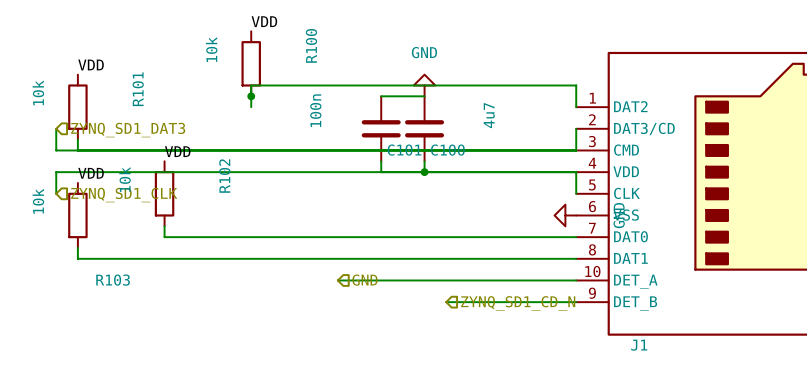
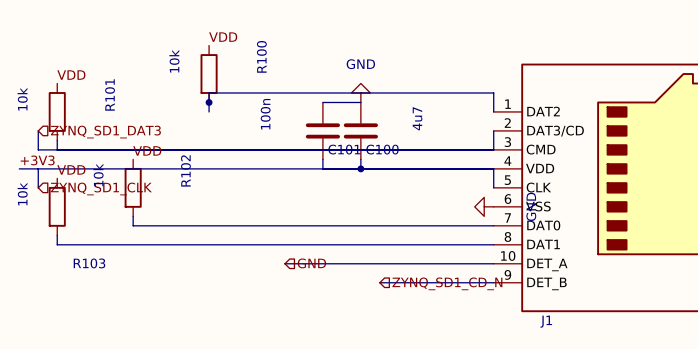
label: none -> +3V3 (37, 160)
wire: none -> (19, 168) (38, 168)

